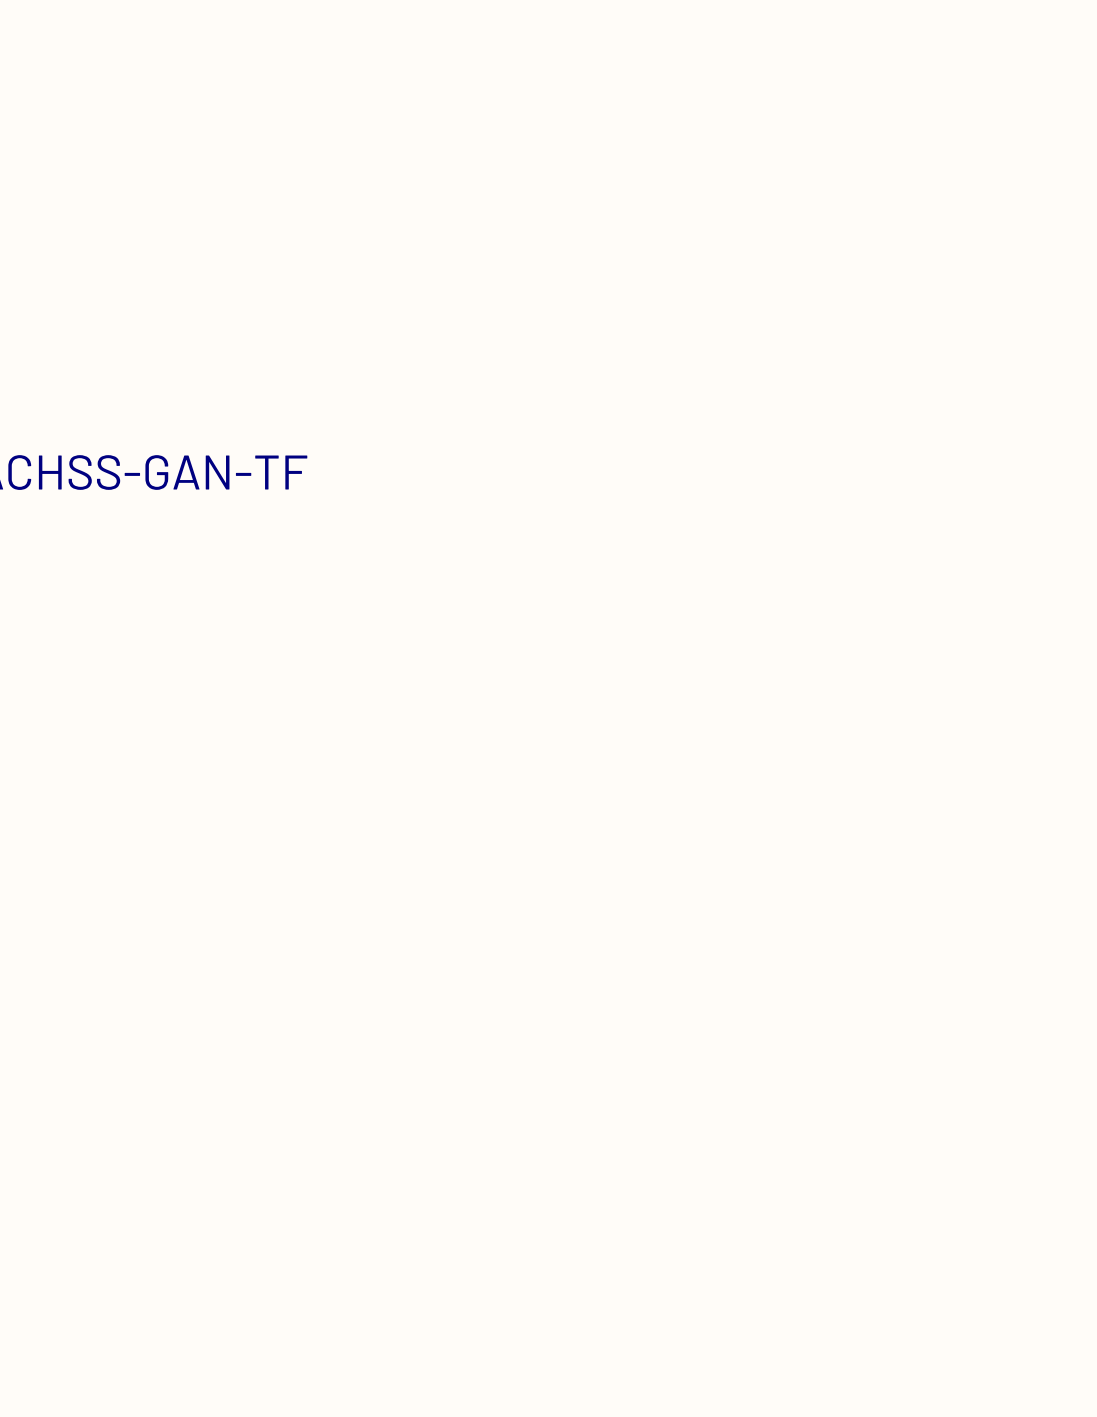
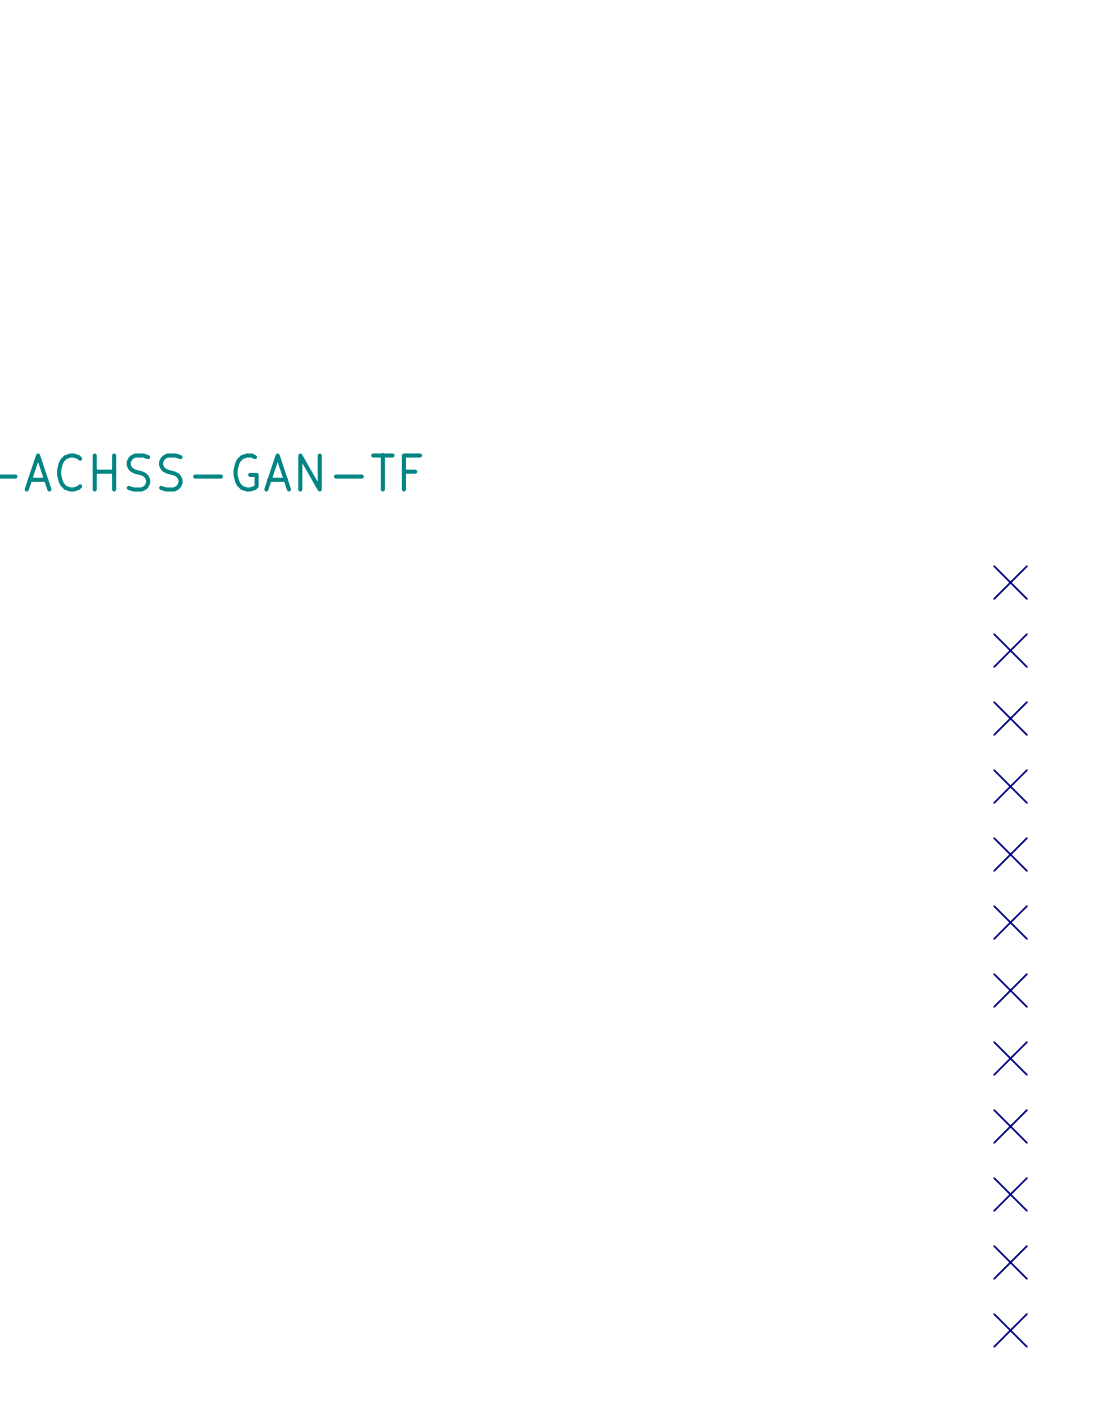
no-connect mark: none -> (1010, 582)
no-connect mark: none -> (1010, 650)
no-connect mark: none -> (1010, 718)
no-connect mark: none -> (1010, 786)
no-connect mark: none -> (1010, 854)
no-connect mark: none -> (1010, 922)
no-connect mark: none -> (1010, 990)
no-connect mark: none -> (1010, 1058)
no-connect mark: none -> (1010, 1126)
no-connect mark: none -> (1010, 1194)
no-connect mark: none -> (1010, 1262)
no-connect mark: none -> (1010, 1330)

